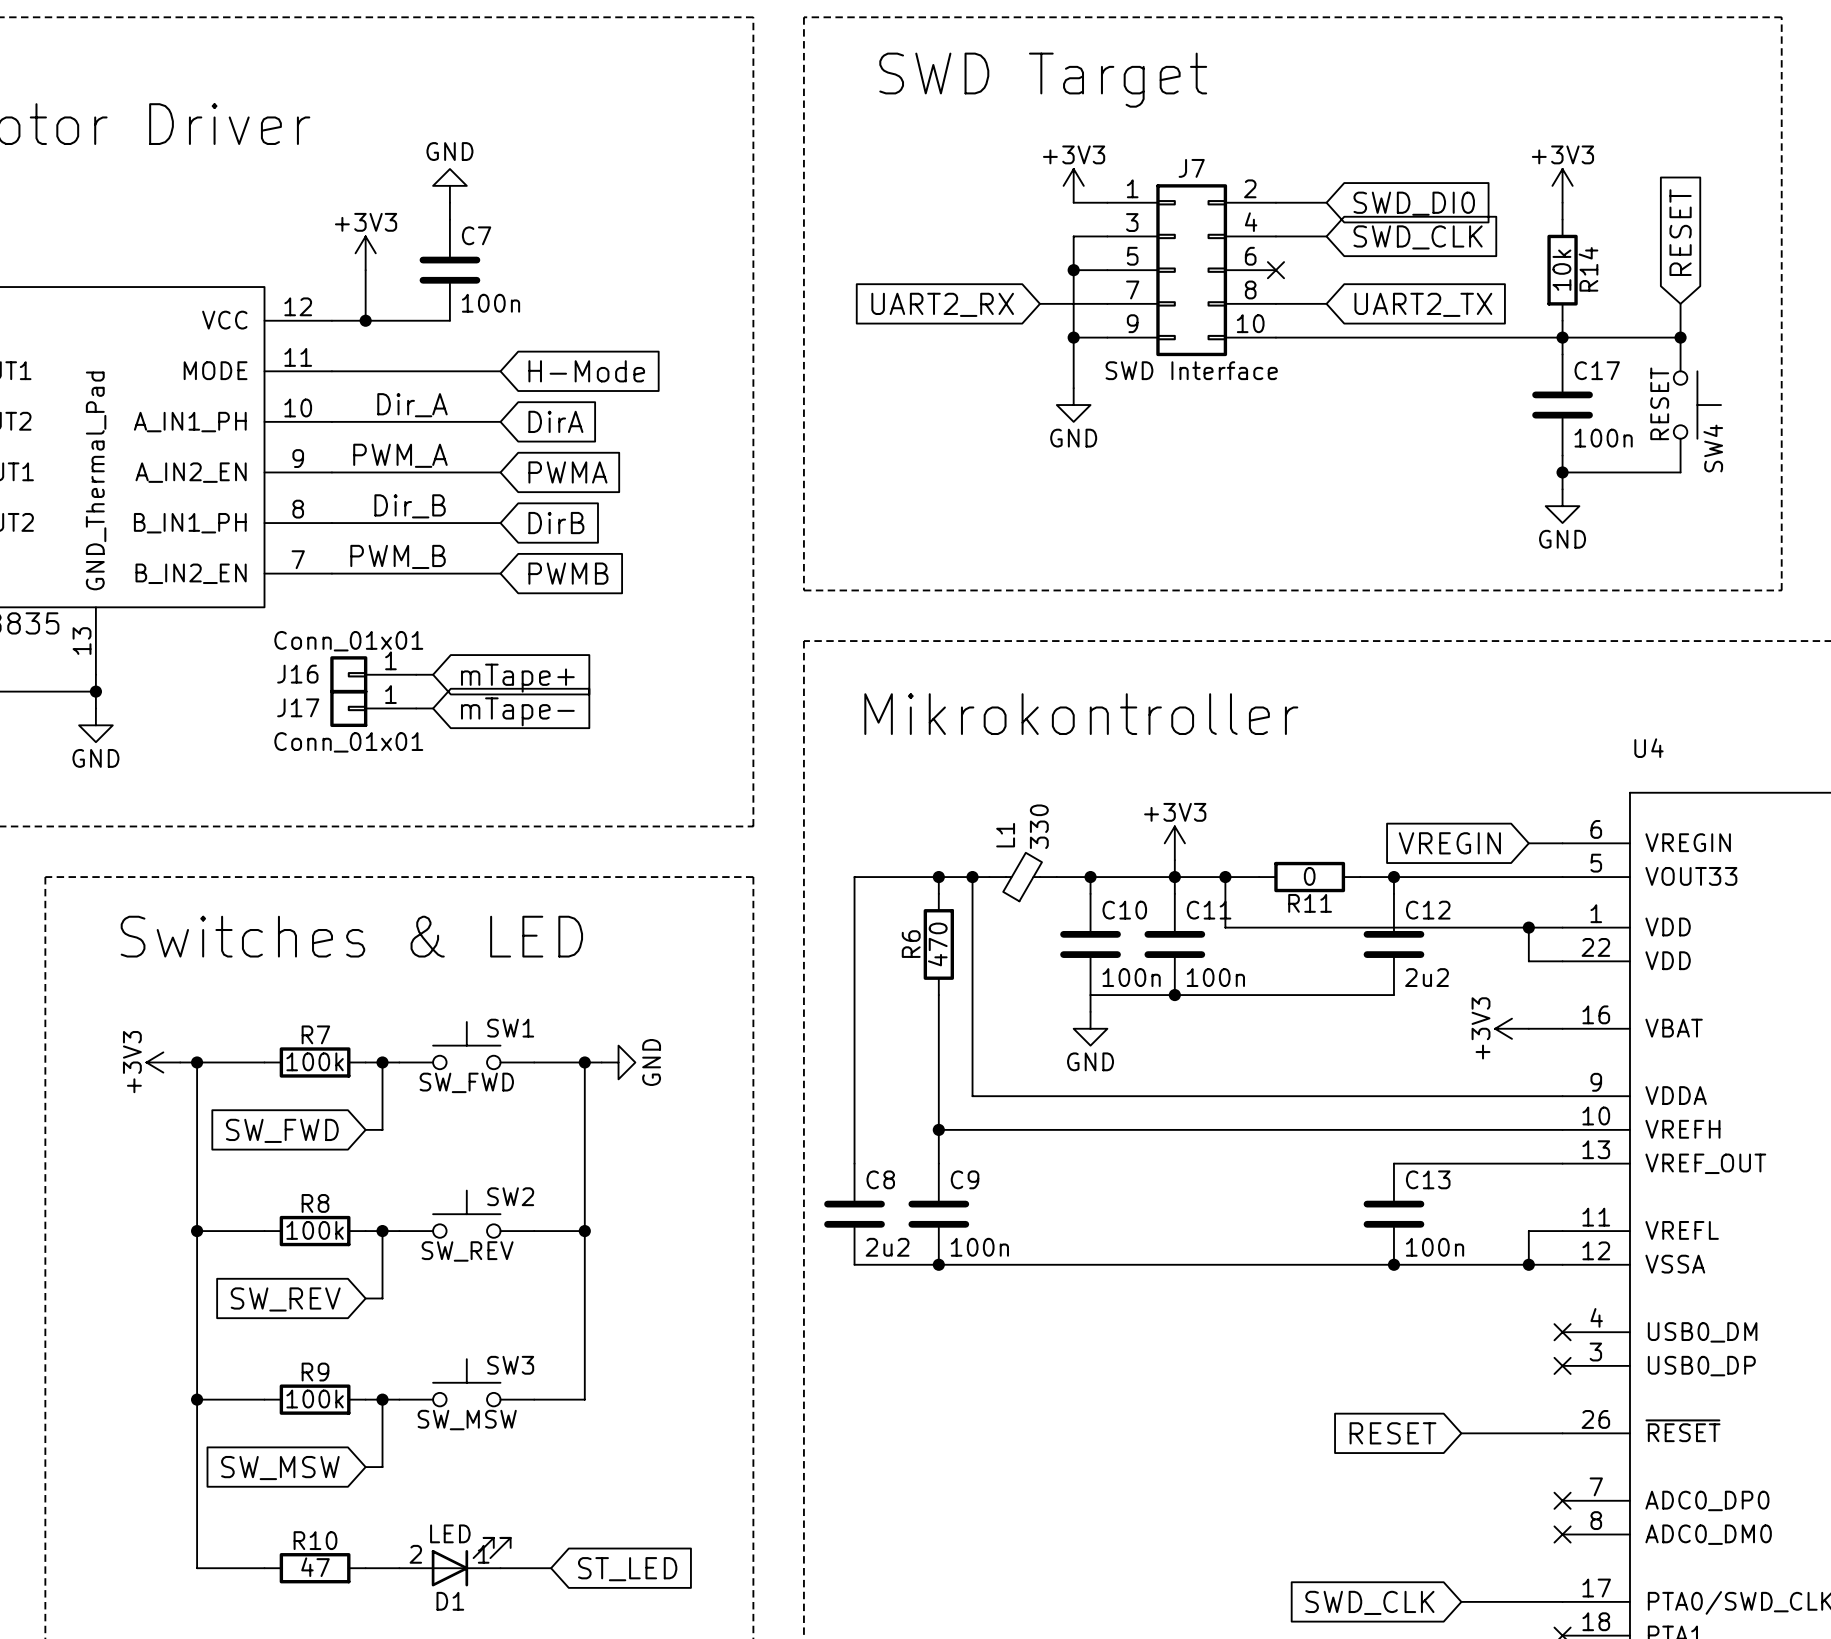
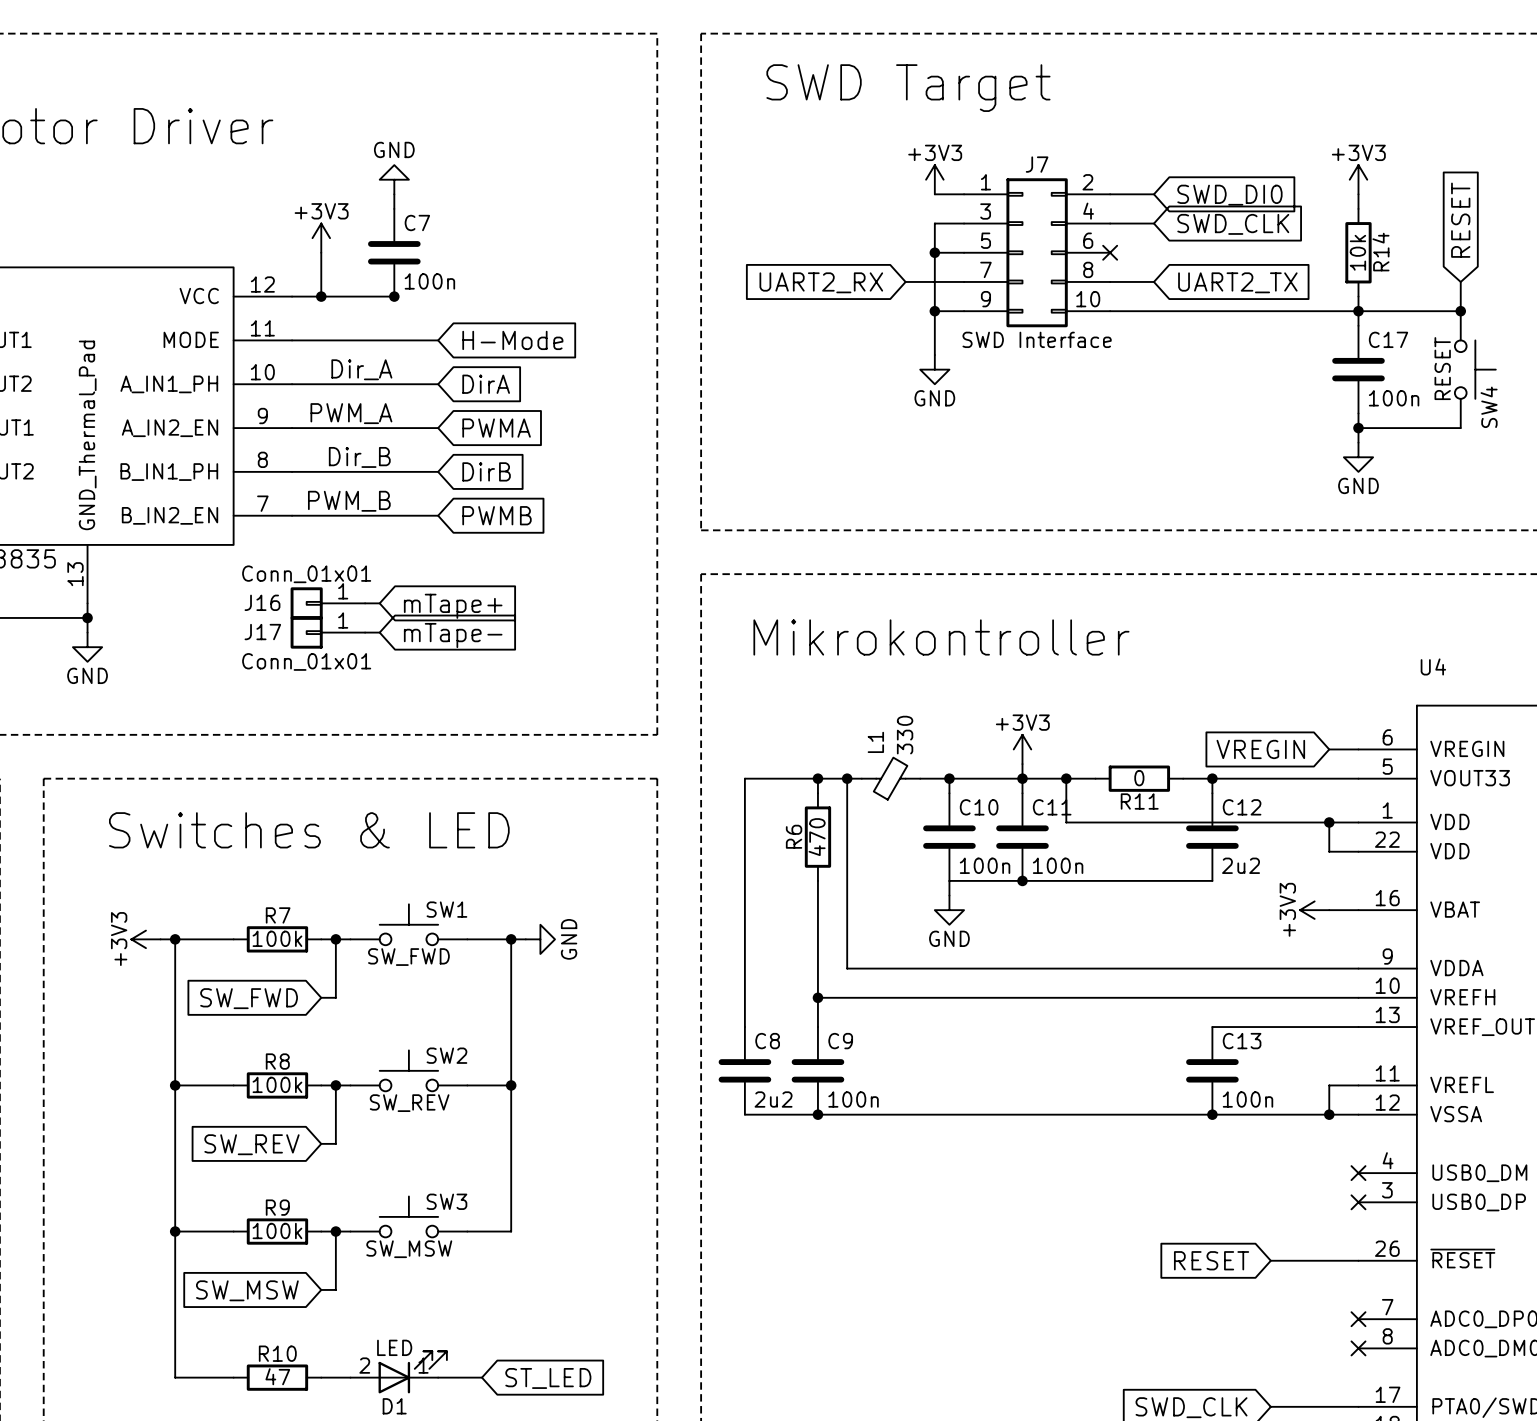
junction: none -> (394, 296)

